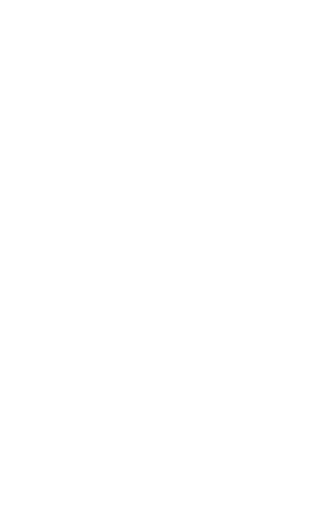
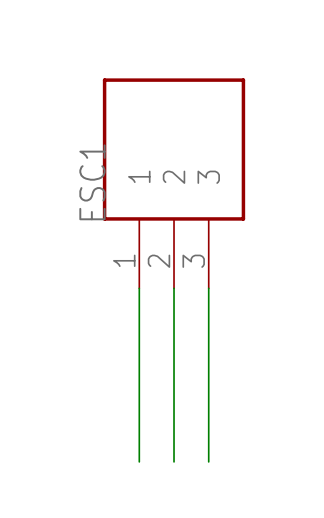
ESC1: none -> (174, 183)
wire: none -> (139, 288) (139, 461)
wire: none -> (174, 288) (174, 461)
wire: none -> (208, 288) (208, 461)

